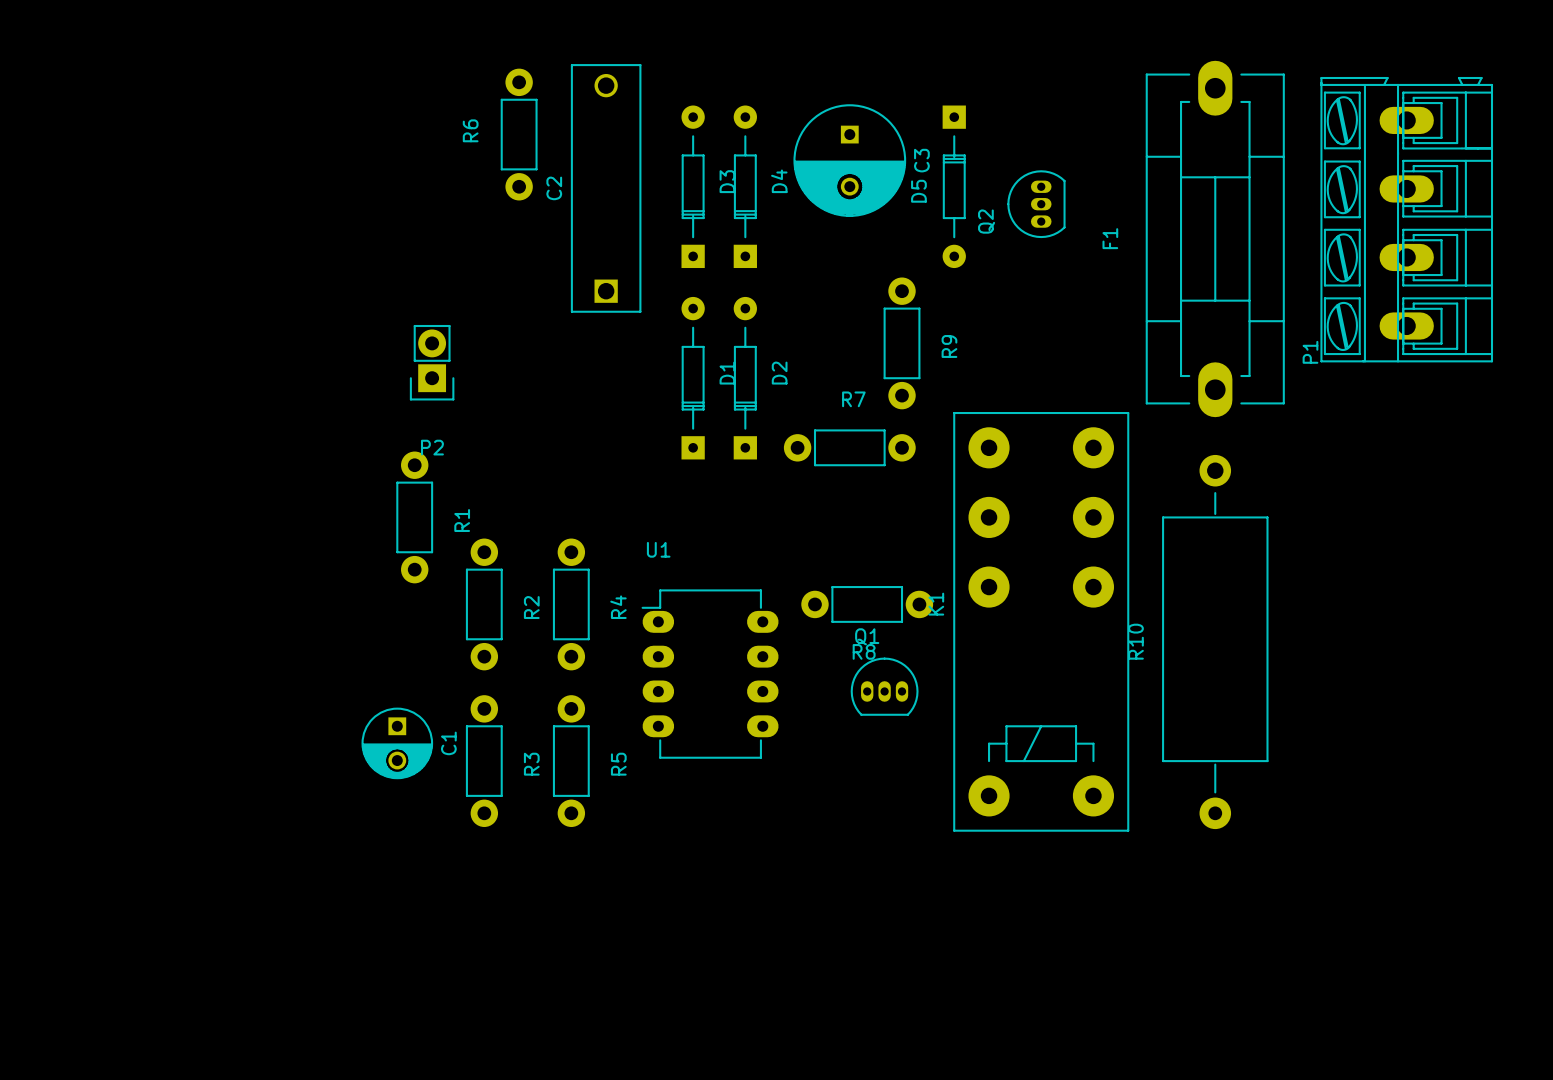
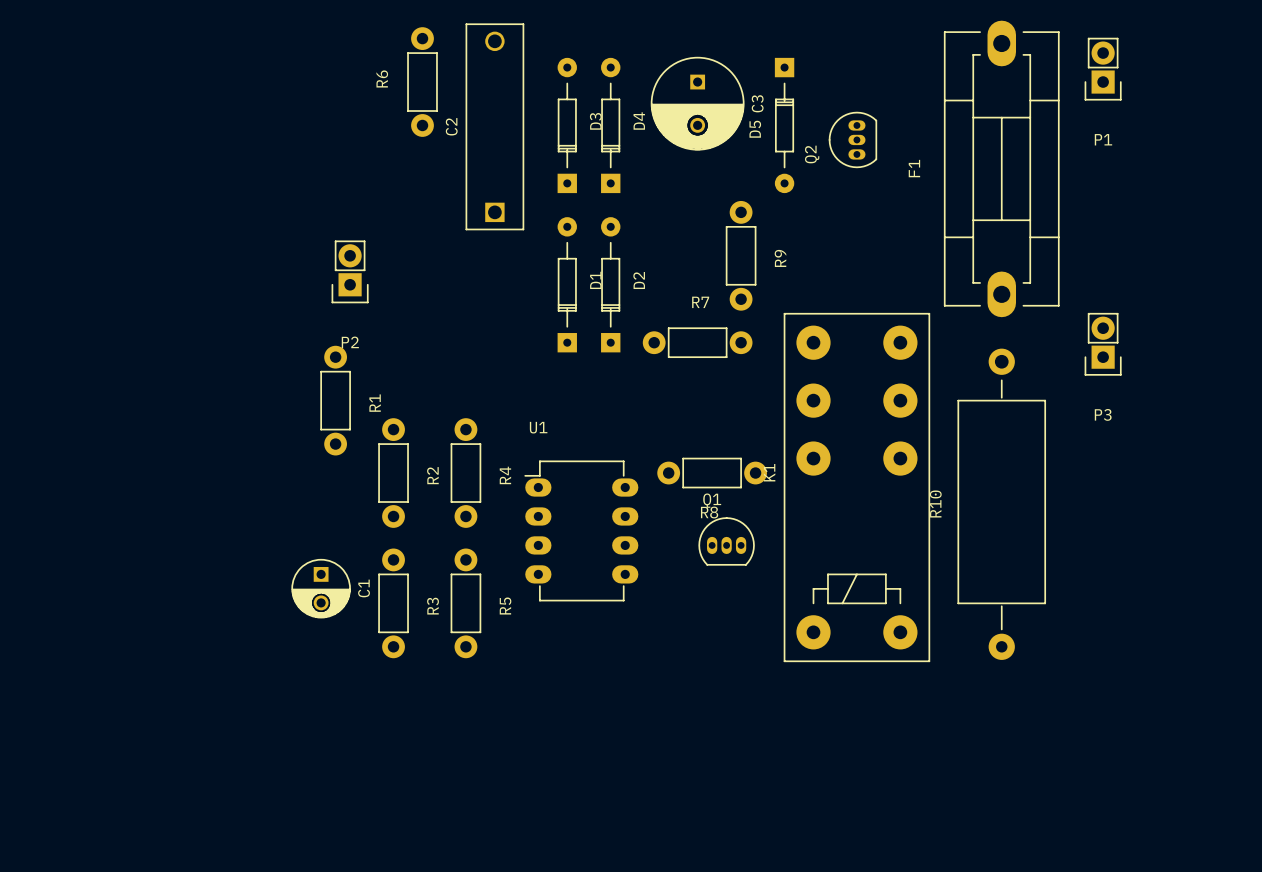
P1 footprint: [1320, 76, 1494, 363] -> [1084, 37, 1122, 101]
P1 name position: P1 (1310, 352) -> P1 (1103, 139)
P3: none -> (1103, 344)

